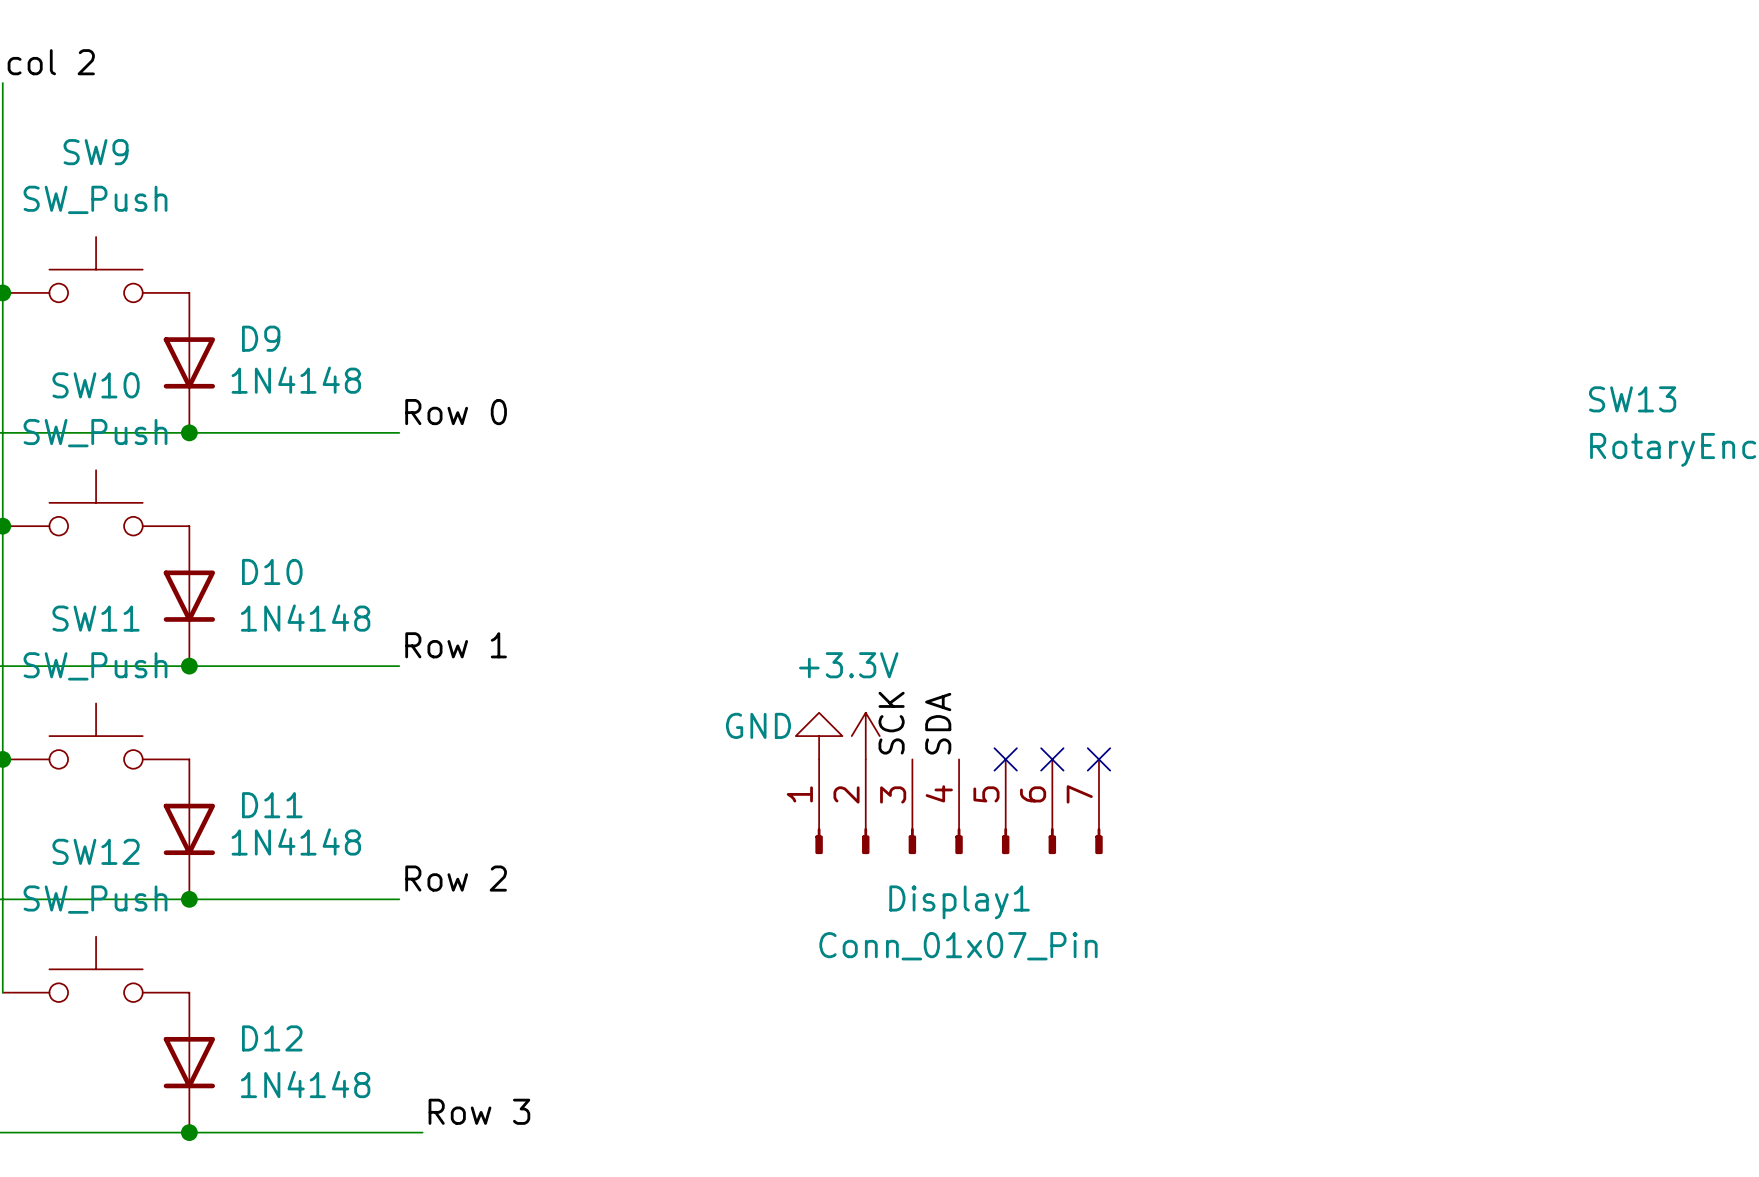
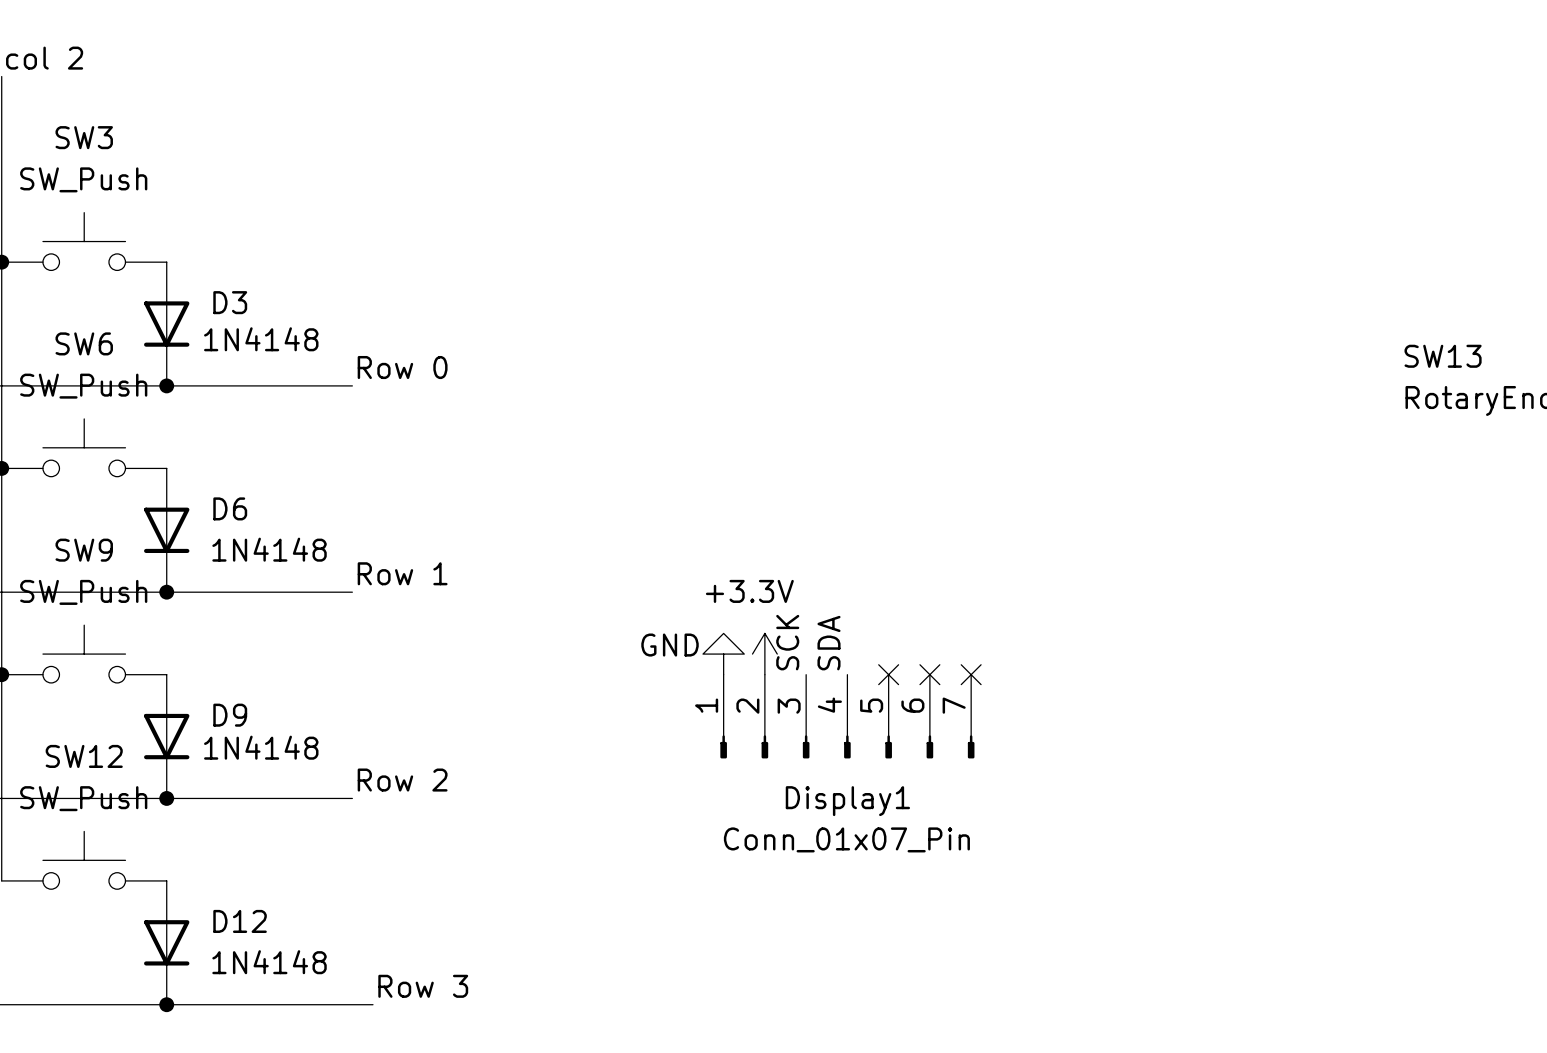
SW9 name: SW9 (96, 152) -> SW3 (84, 137)
D9 name: D9 (261, 338) -> D3 (230, 302)
SW10 name: SW10 (96, 385) -> SW6 (84, 343)
D10 name: D10 (272, 571) -> D6 (230, 508)
SW11 name: SW11 (96, 618) -> SW9 (84, 550)
D11 name: D11 (272, 805) -> D9 (230, 715)

